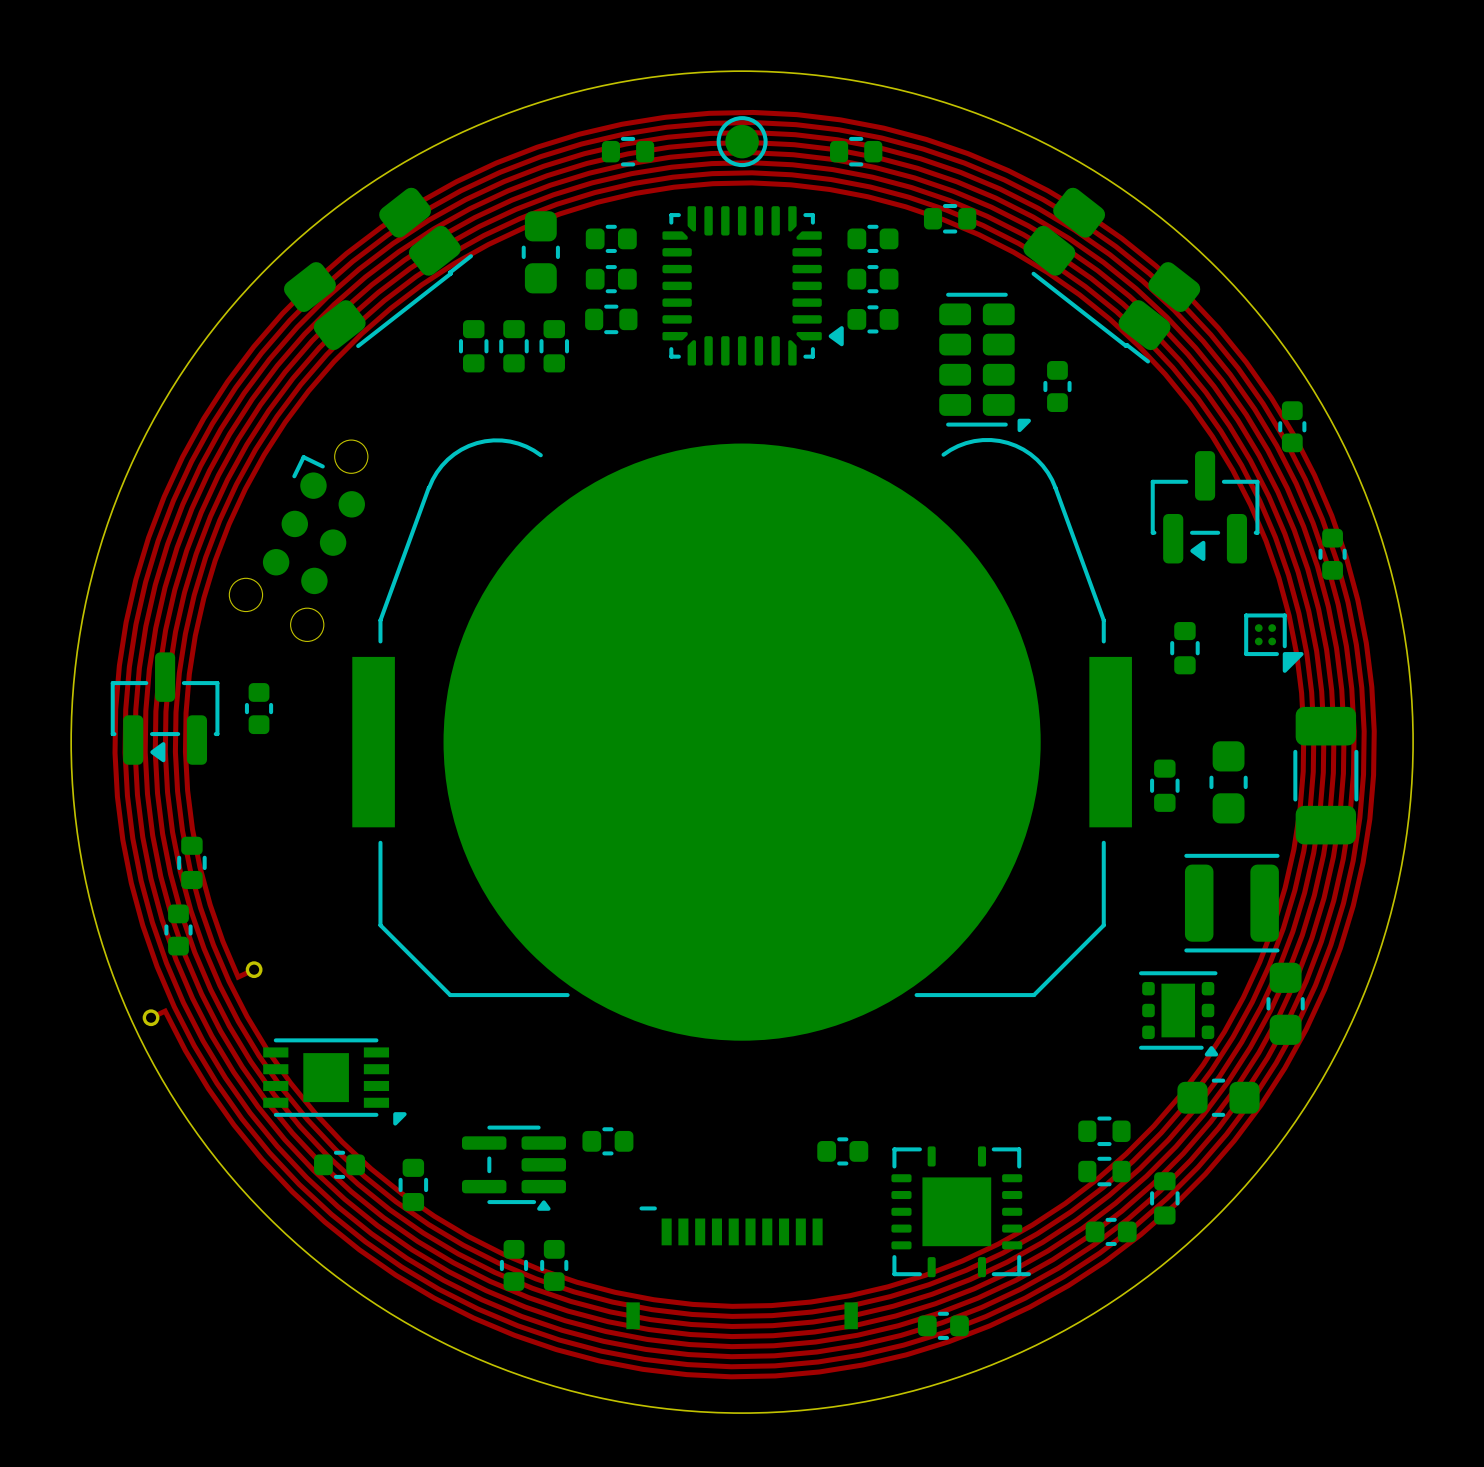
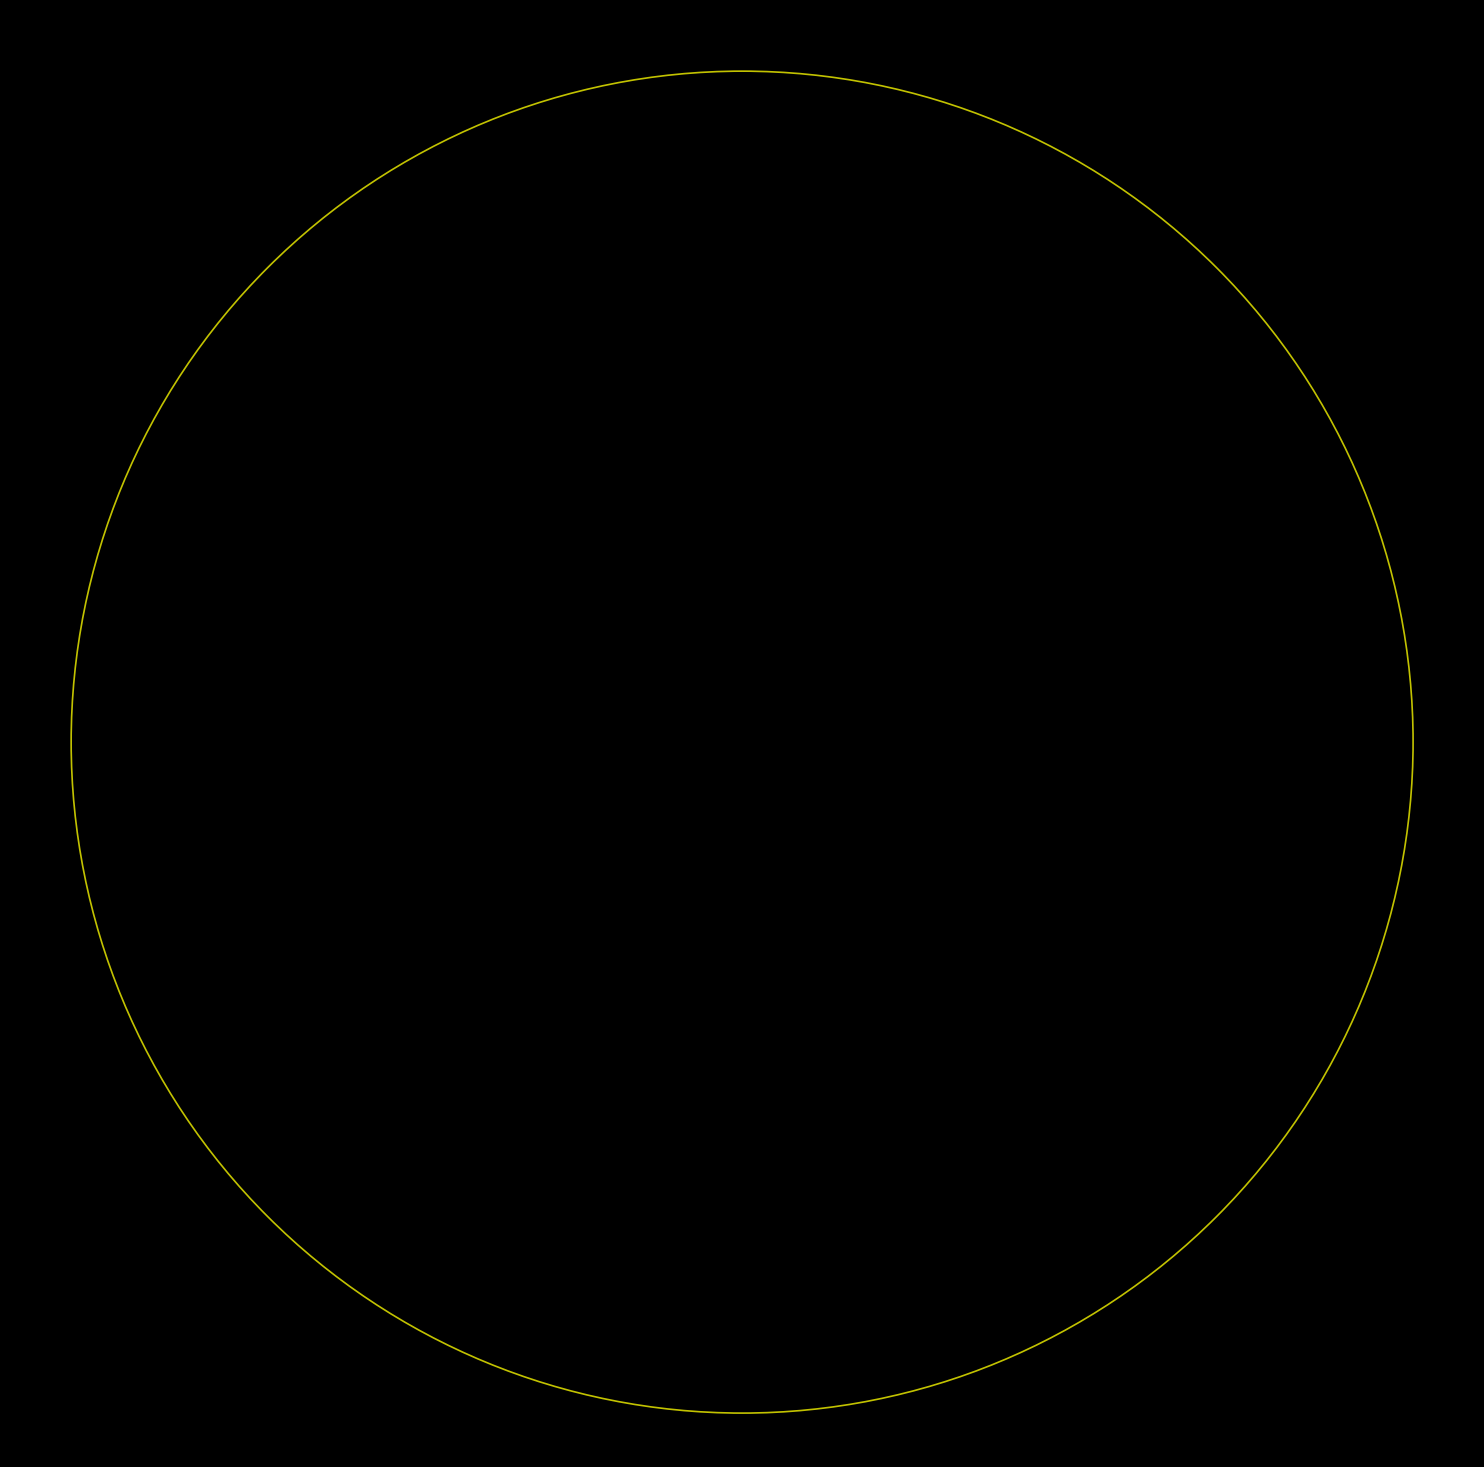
part: (742, 141) -> none
part: (628, 151) -> none
part: (856, 151) -> none
part: (950, 218) -> none
part: (611, 238) -> none
part: (872, 238) -> none
part: (540, 252) -> none
part: (378, 268) -> none
part: (1111, 275) -> none
part: (611, 279) -> none
part: (872, 279) -> none
part: (753, 285) -> none
part: (611, 319) -> none
part: (872, 319) -> none
part: (473, 346) -> none
part: (513, 346) -> none
part: (554, 346) -> none
part: (985, 362) -> none
part: (1057, 386) -> none
part: (1292, 426) -> none
part: (1205, 507) -> none
part: (298, 540) -> none
part: (1332, 554) -> none
part: (1273, 643) -> none
part: (1184, 648) -> none
part: (165, 708) -> none
part: (259, 708) -> none
part: (742, 739) -> none
part: (744, 744) -> none
part: (1325, 775) -> none
part: (1228, 782) -> none
part: (1164, 785) -> none
part: (191, 862) -> none
part: (1231, 903) -> none
part: (178, 929) -> none
part: (1285, 1003) -> none
part: (1178, 1013) -> none
part: (334, 1081) -> none
part: (1218, 1097) -> none
part: (1104, 1131) -> none
part: (607, 1141) -> none
part: (842, 1151) -> none
part: (339, 1164) -> none
part: (513, 1168) -> none
part: (1104, 1171) -> none
part: (413, 1184) -> none
part: (1164, 1198) -> none
part: (961, 1211) -> none
part: (1111, 1231) -> none
part: (513, 1265) -> none
part: (554, 1265) -> none
part: (742, 1267) -> none
part: (943, 1325) -> none

